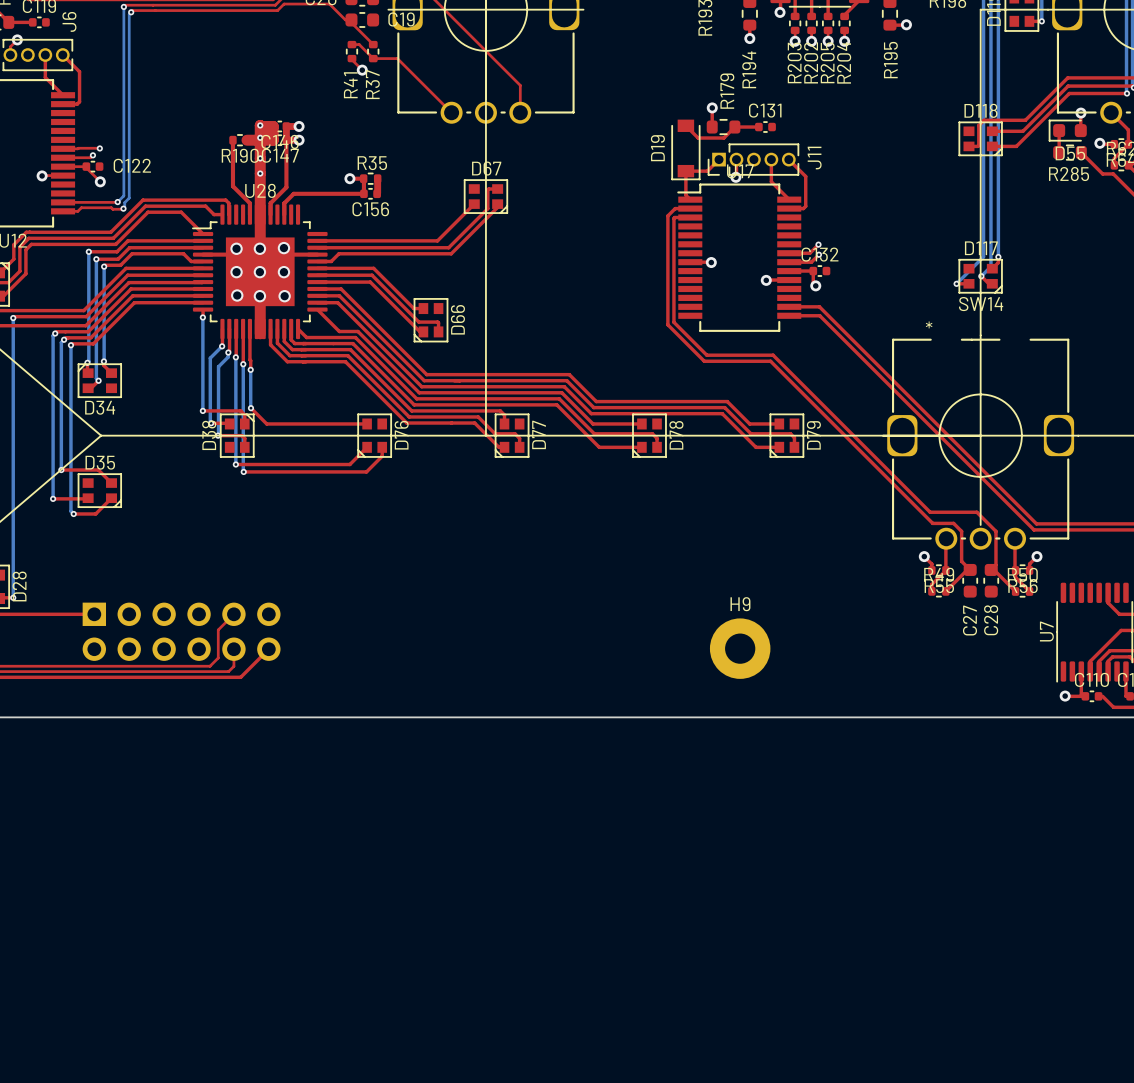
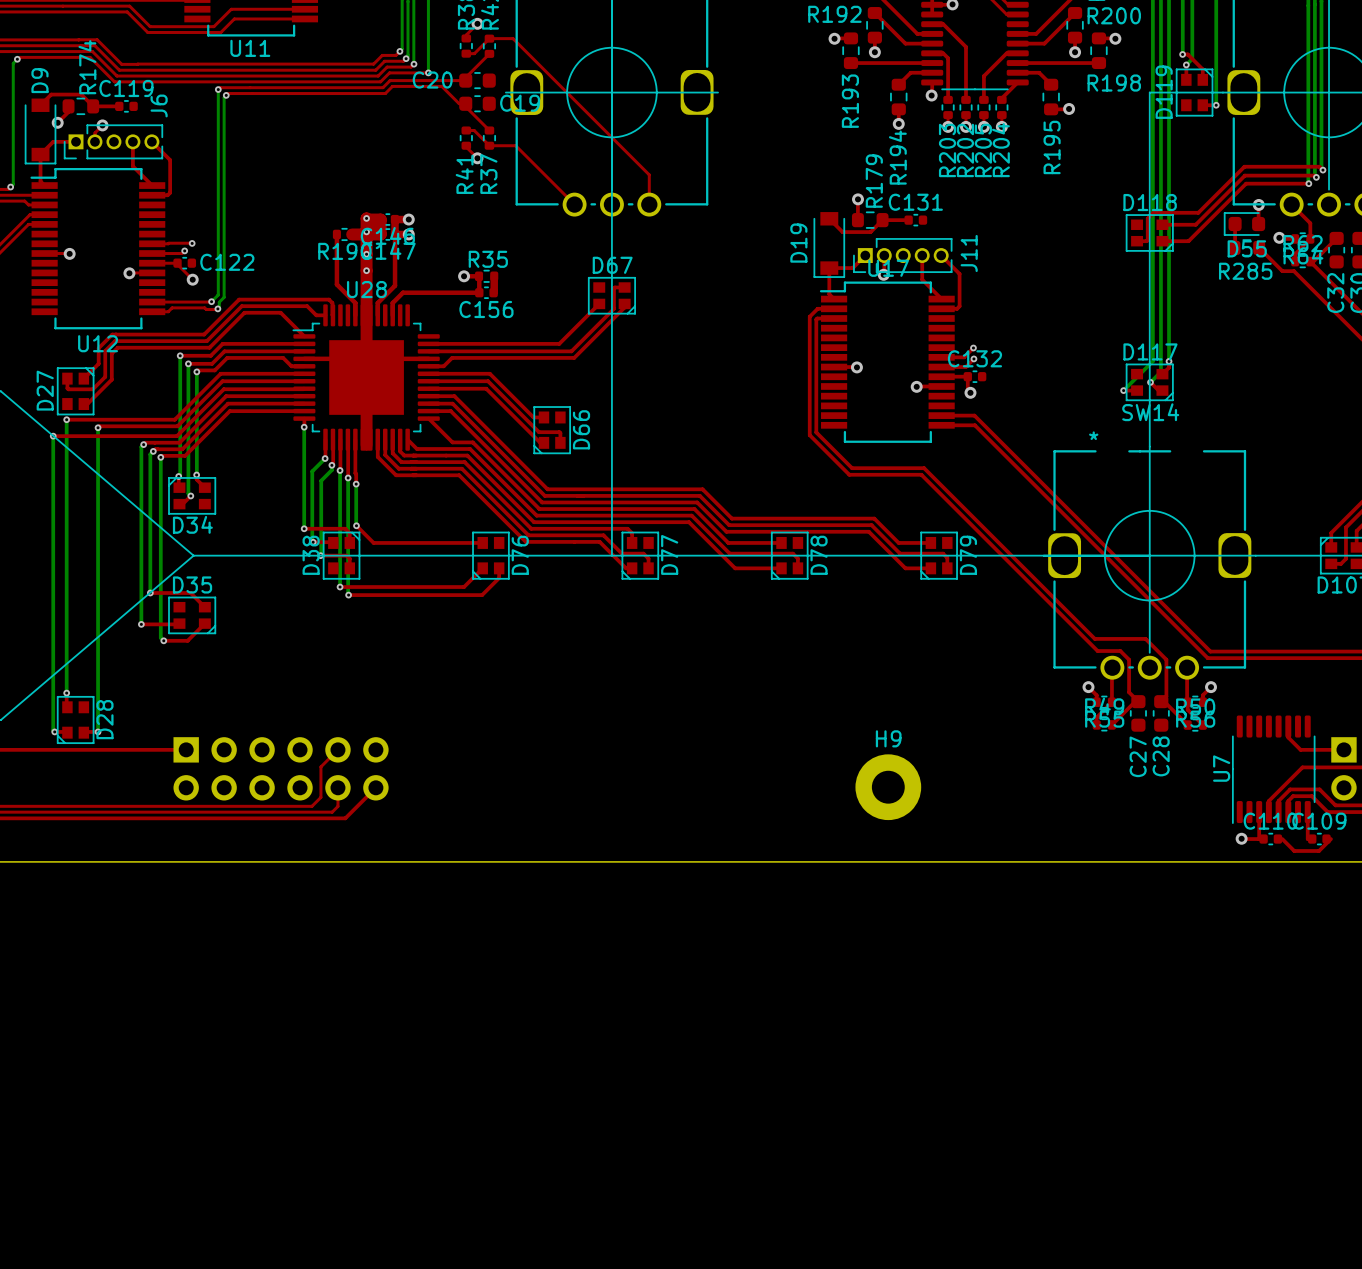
via: (236, 248) -> none
via: (259, 248) -> none
via: (283, 248) -> none
via: (236, 272) -> none
via: (259, 272) -> none
via: (283, 272) -> none
via: (237, 295) -> none
via: (259, 296) -> none
via: (284, 296) -> none

